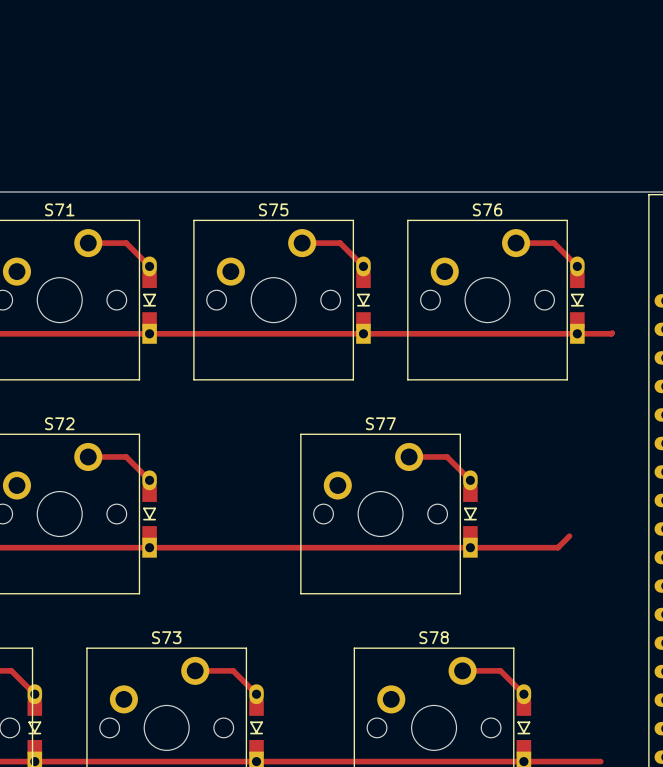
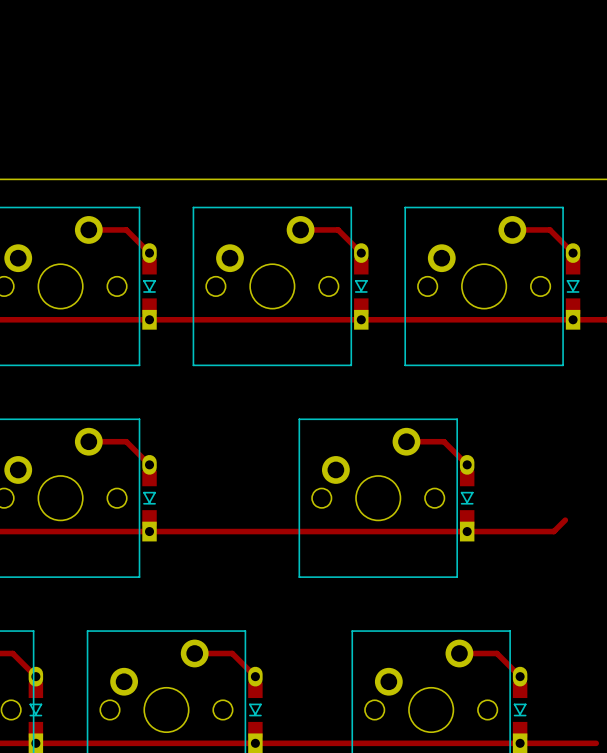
S71 name: S71 (59, 209) -> none
S75 name: S75 (273, 209) -> none
S76 name: S76 (487, 209) -> none
S72 name: S72 (59, 423) -> none
S77 name: S77 (380, 423) -> none
S73 name: S73 (166, 637) -> none
S78 name: S78 (434, 637) -> none

